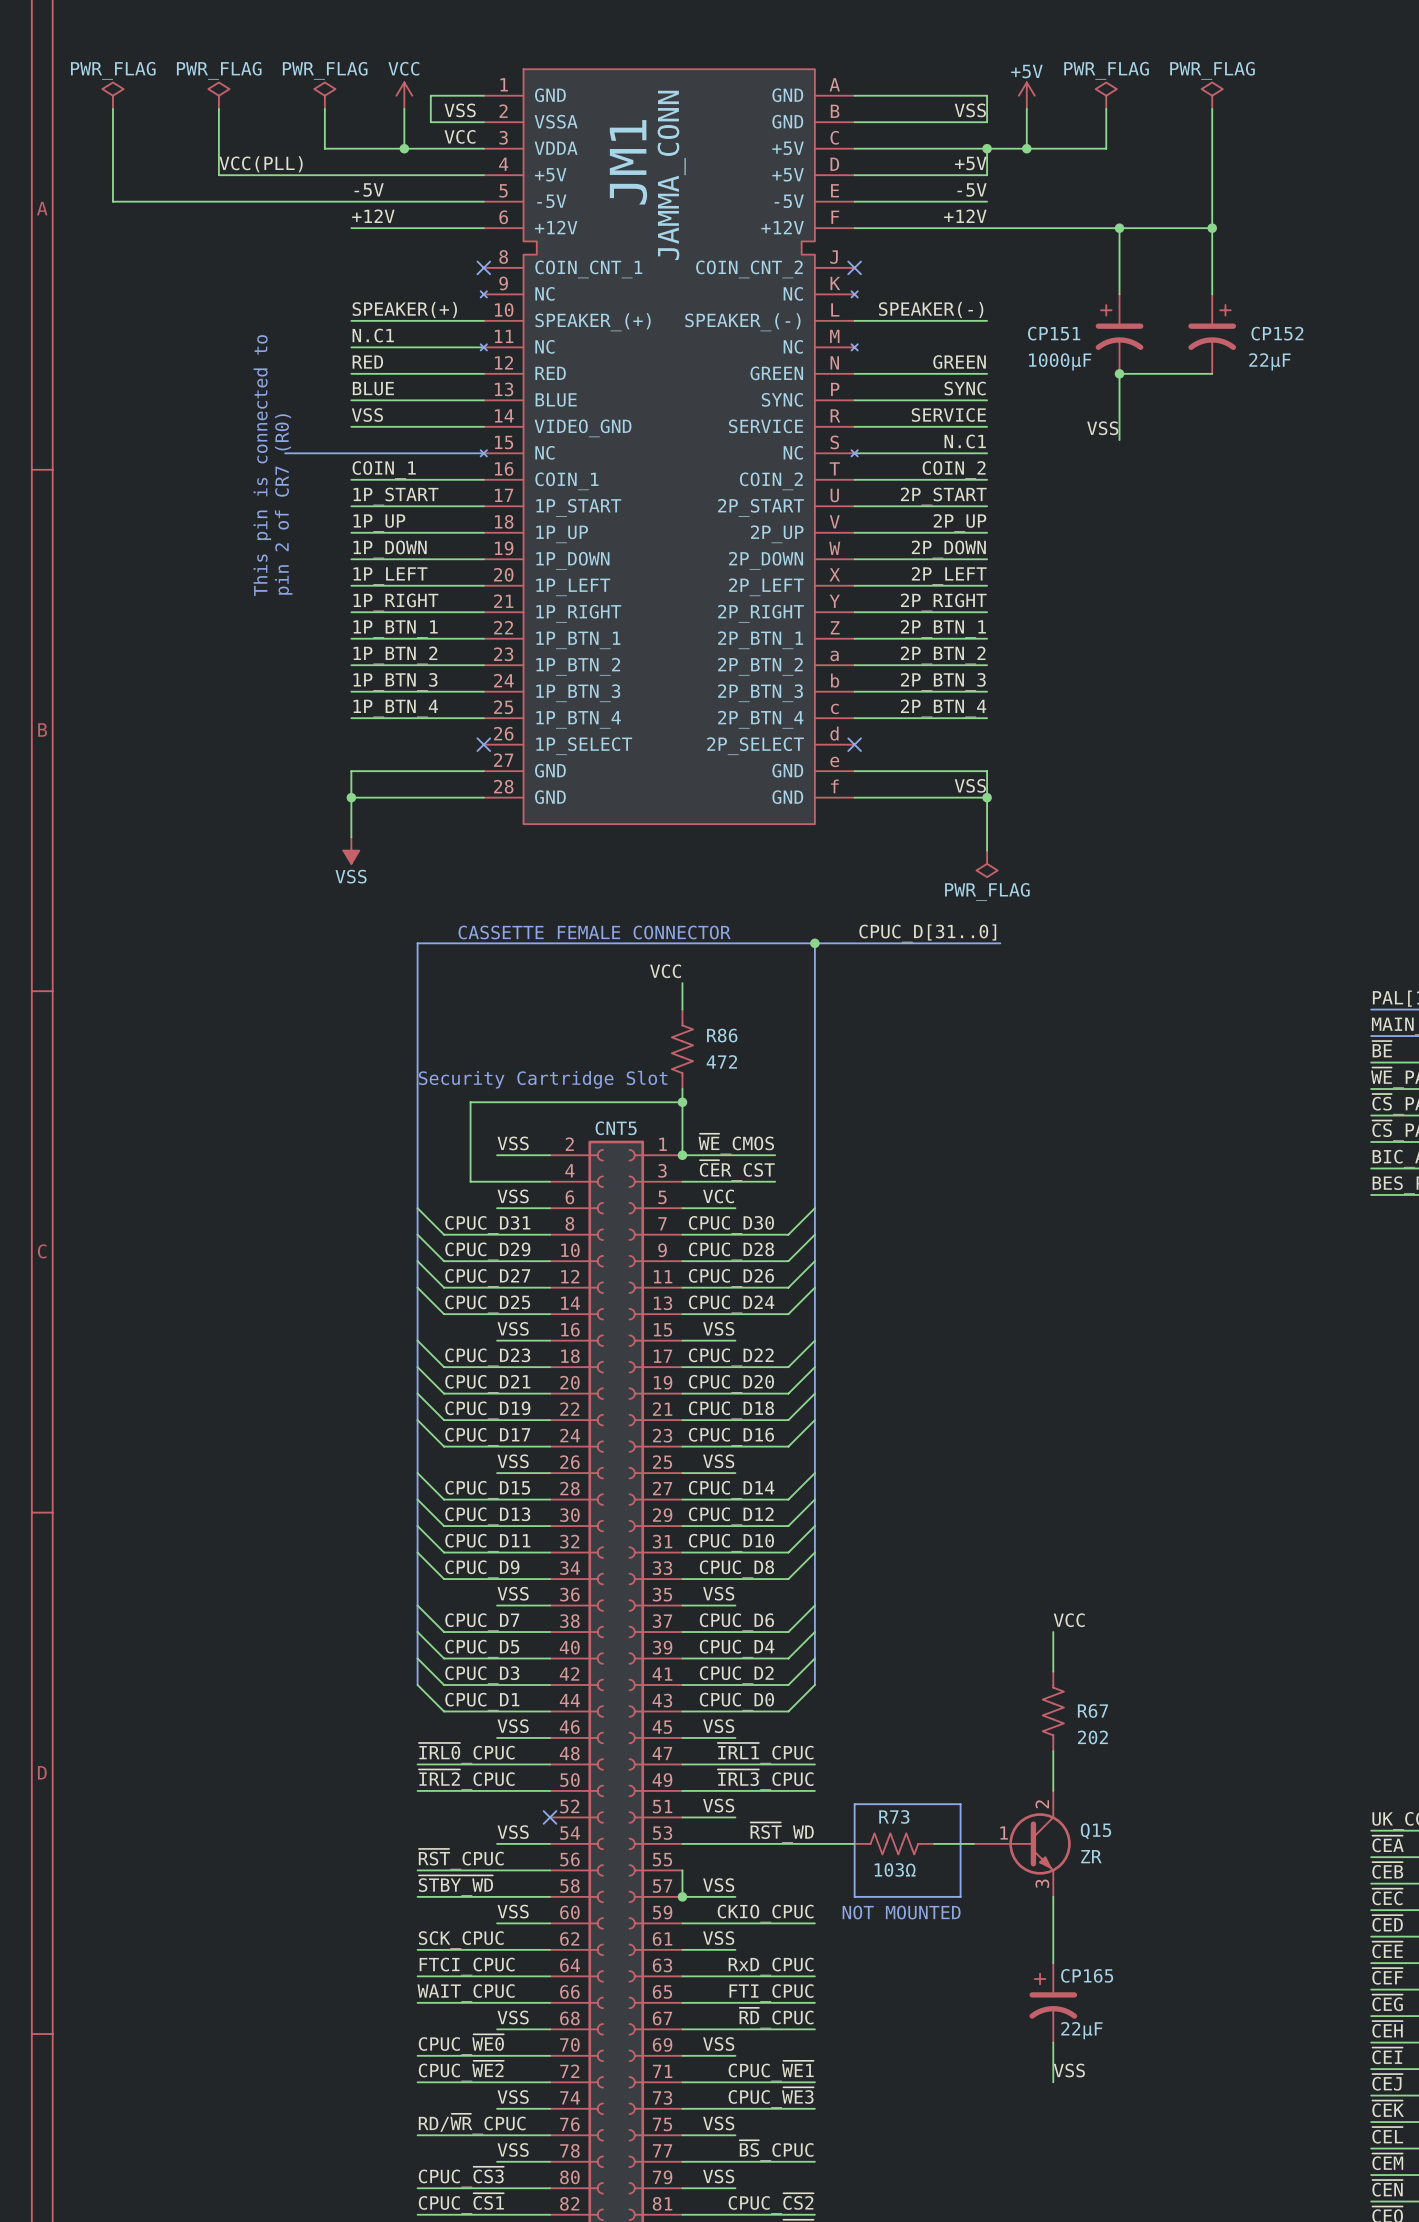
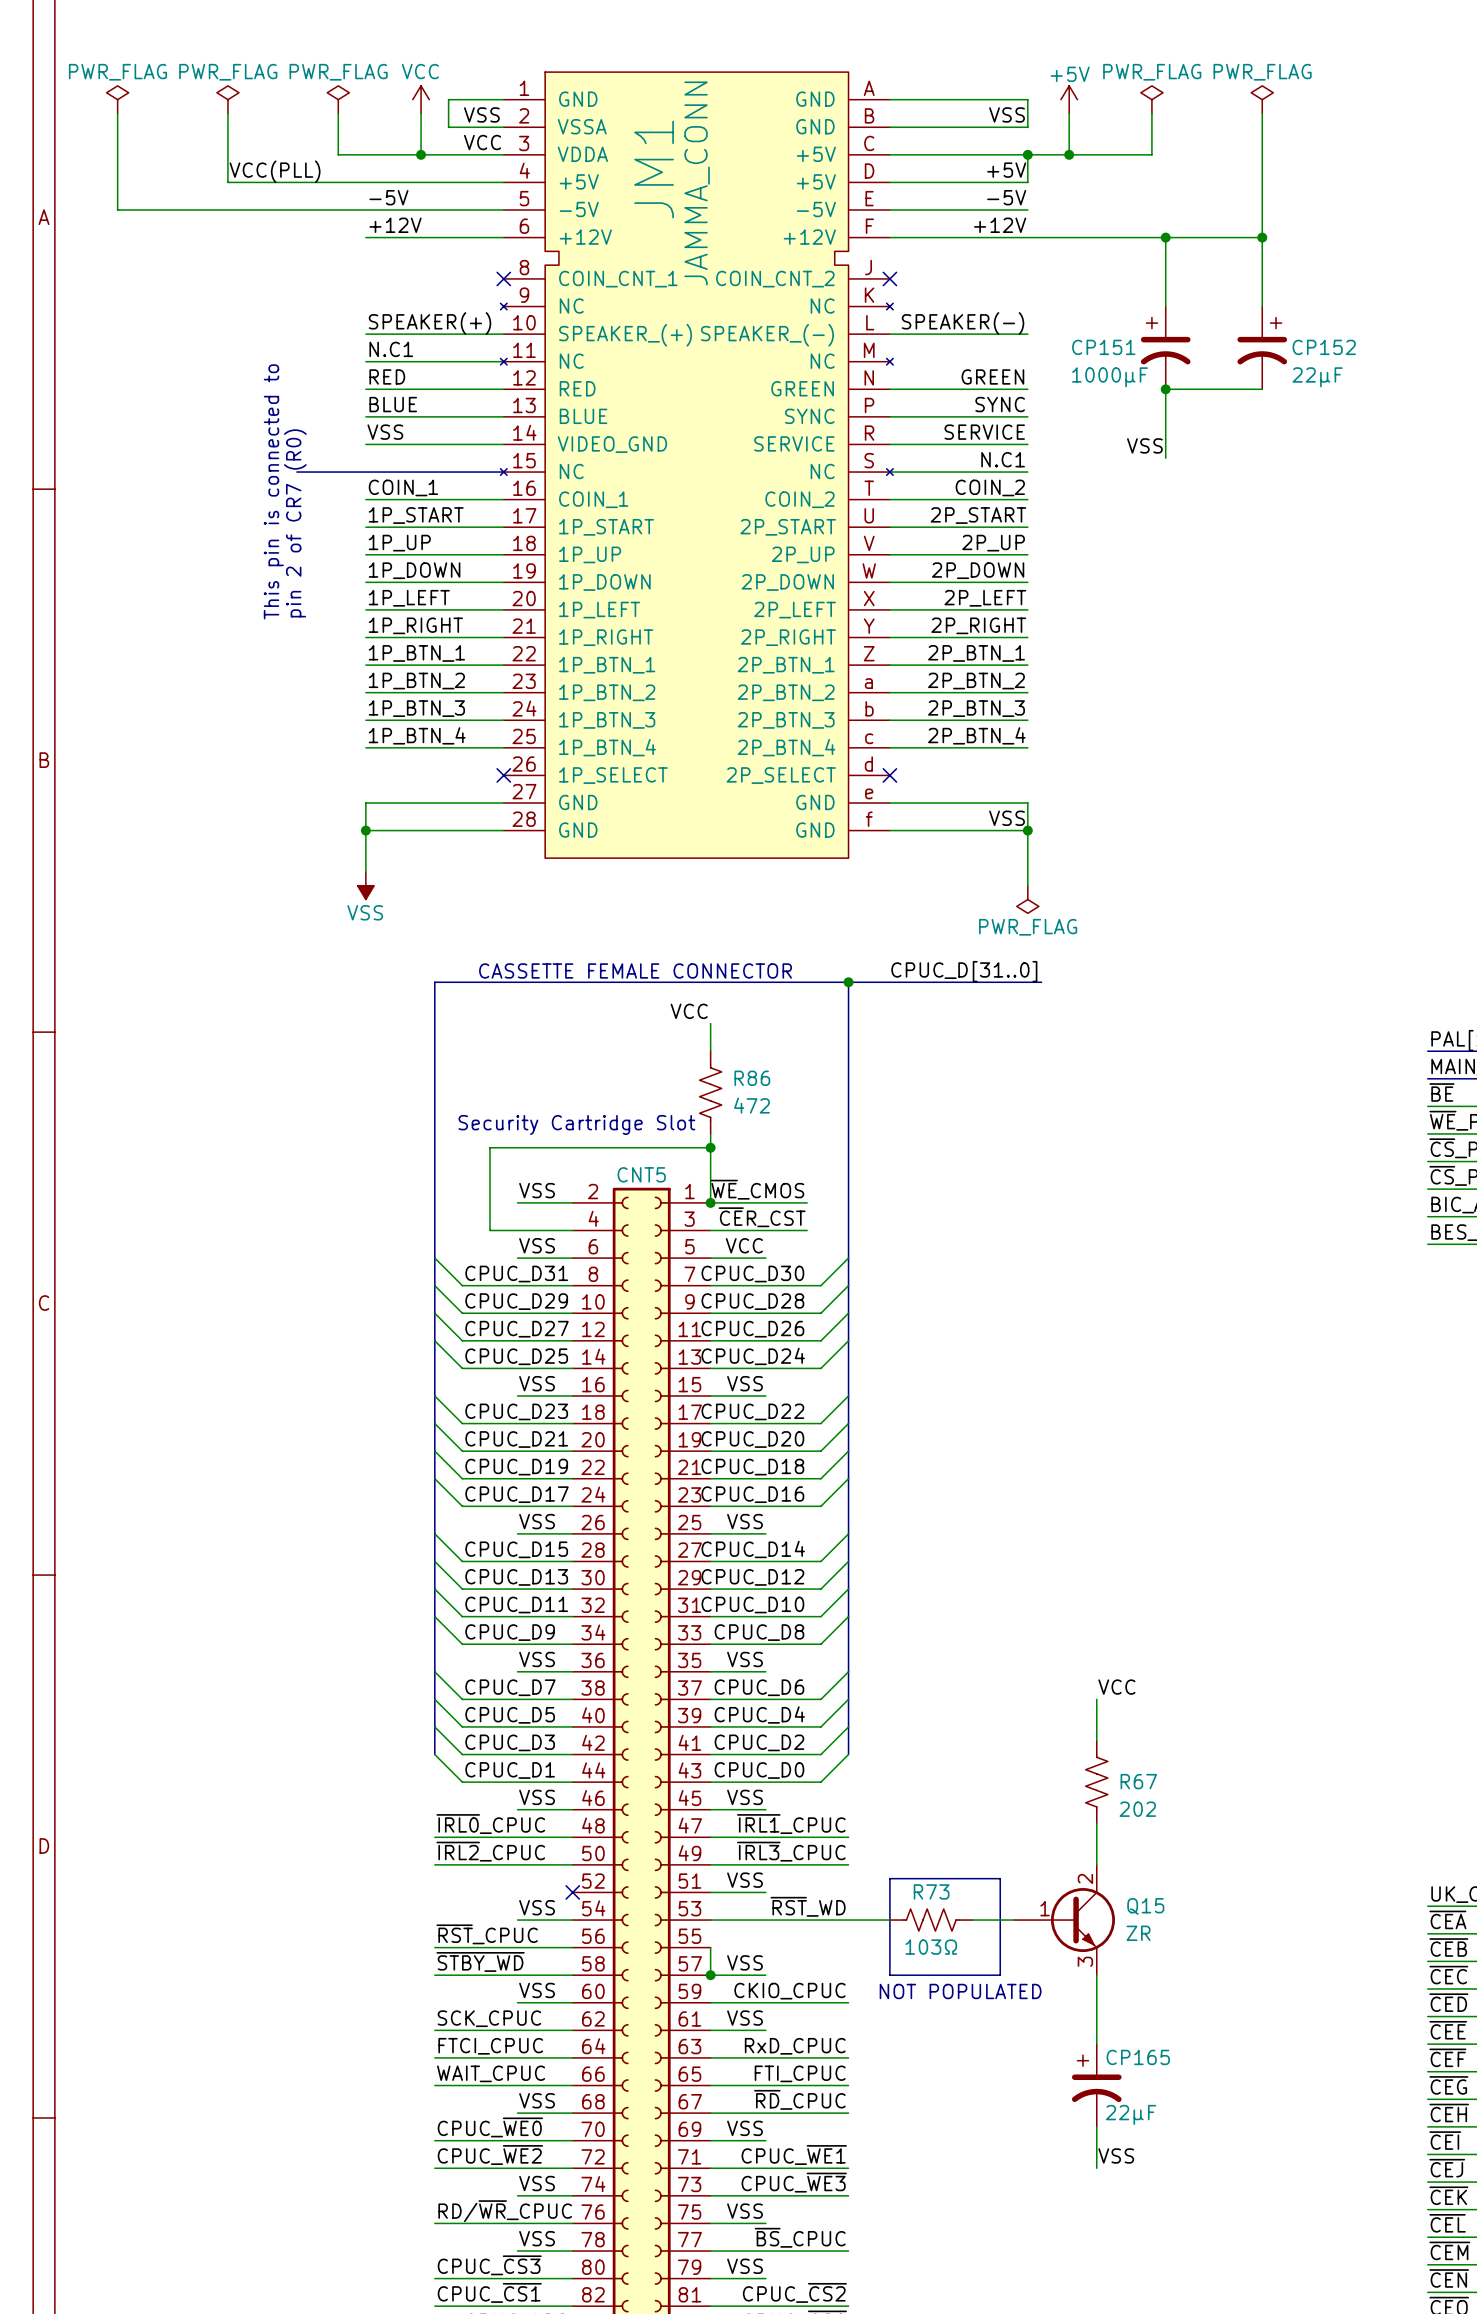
text: NOT MOUNTED (901, 1912) -> NOT POPULATED (960, 1991)

